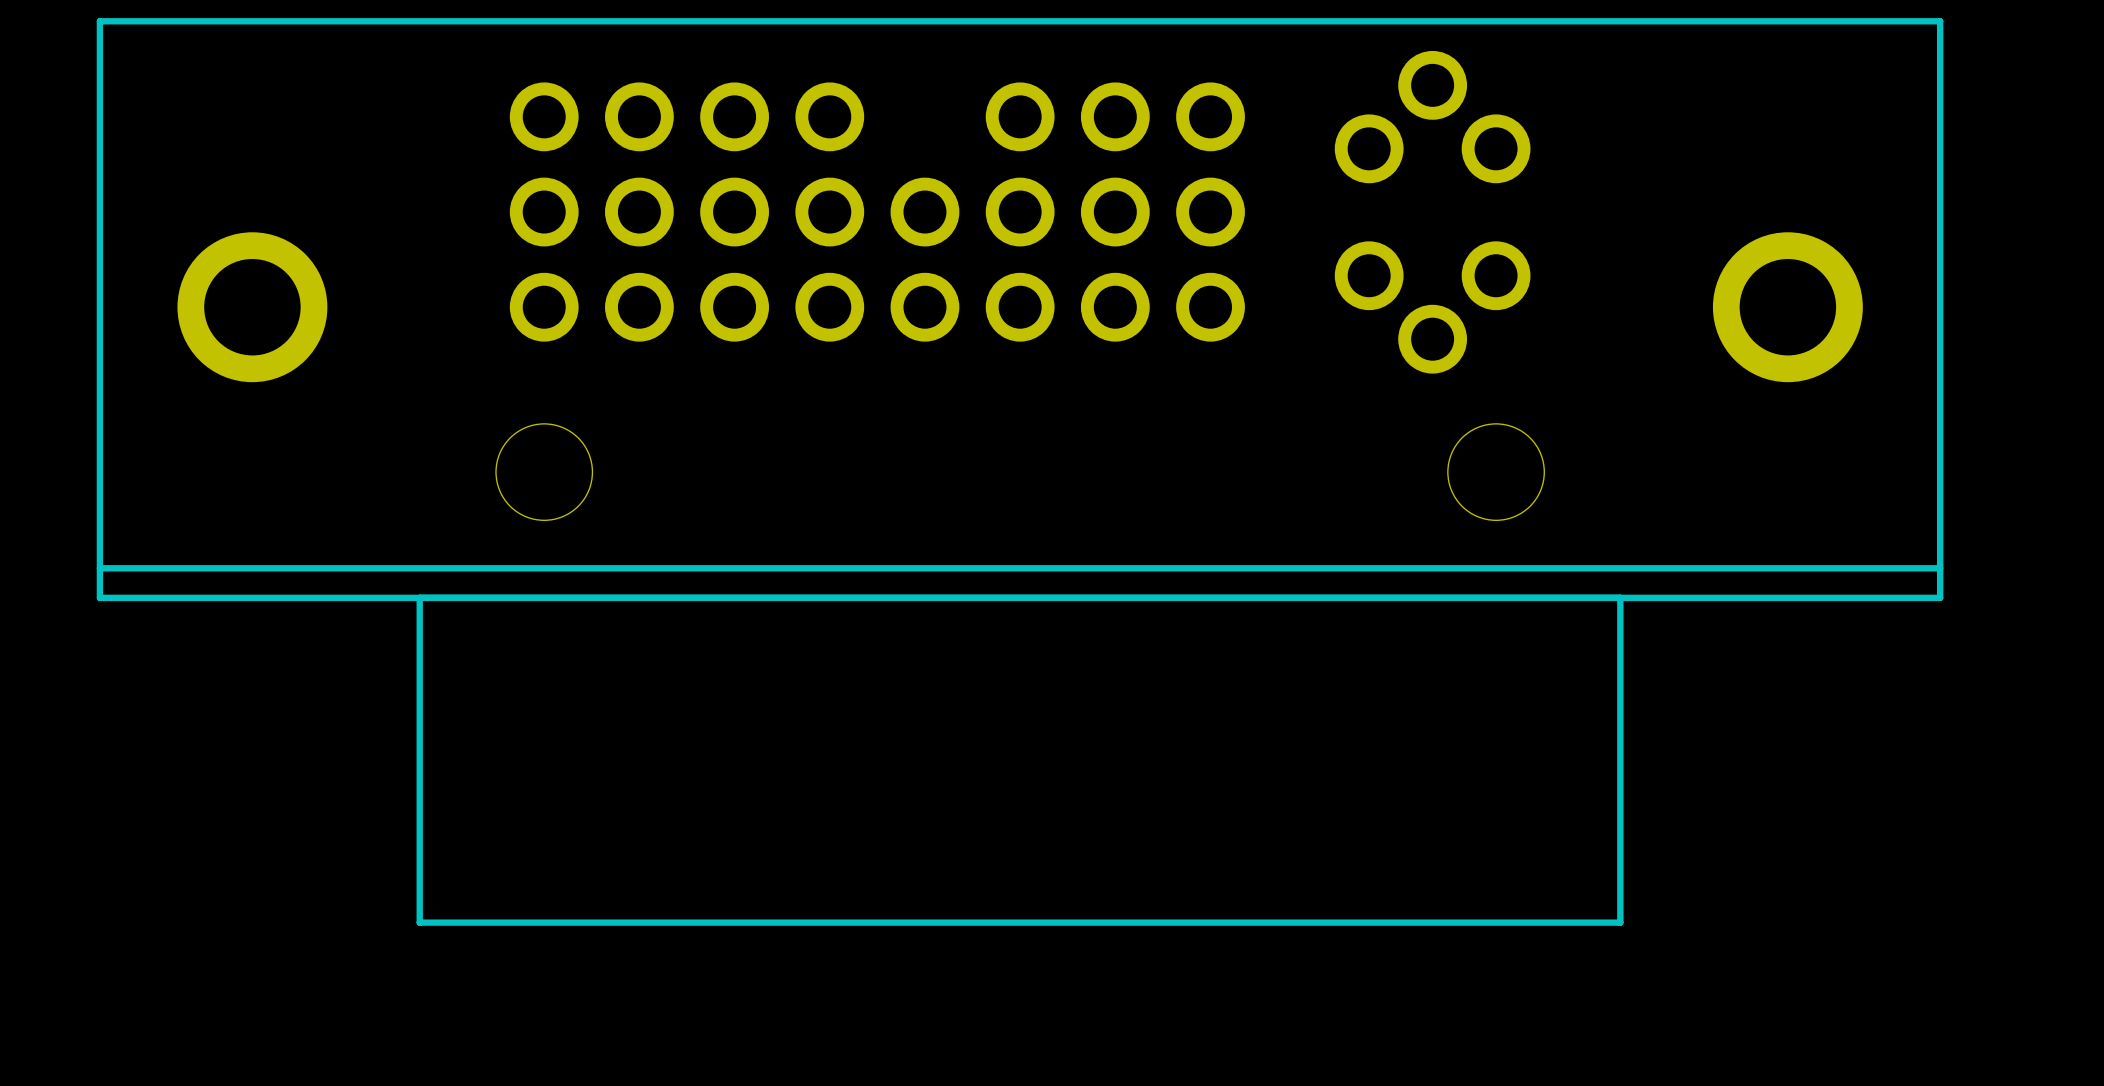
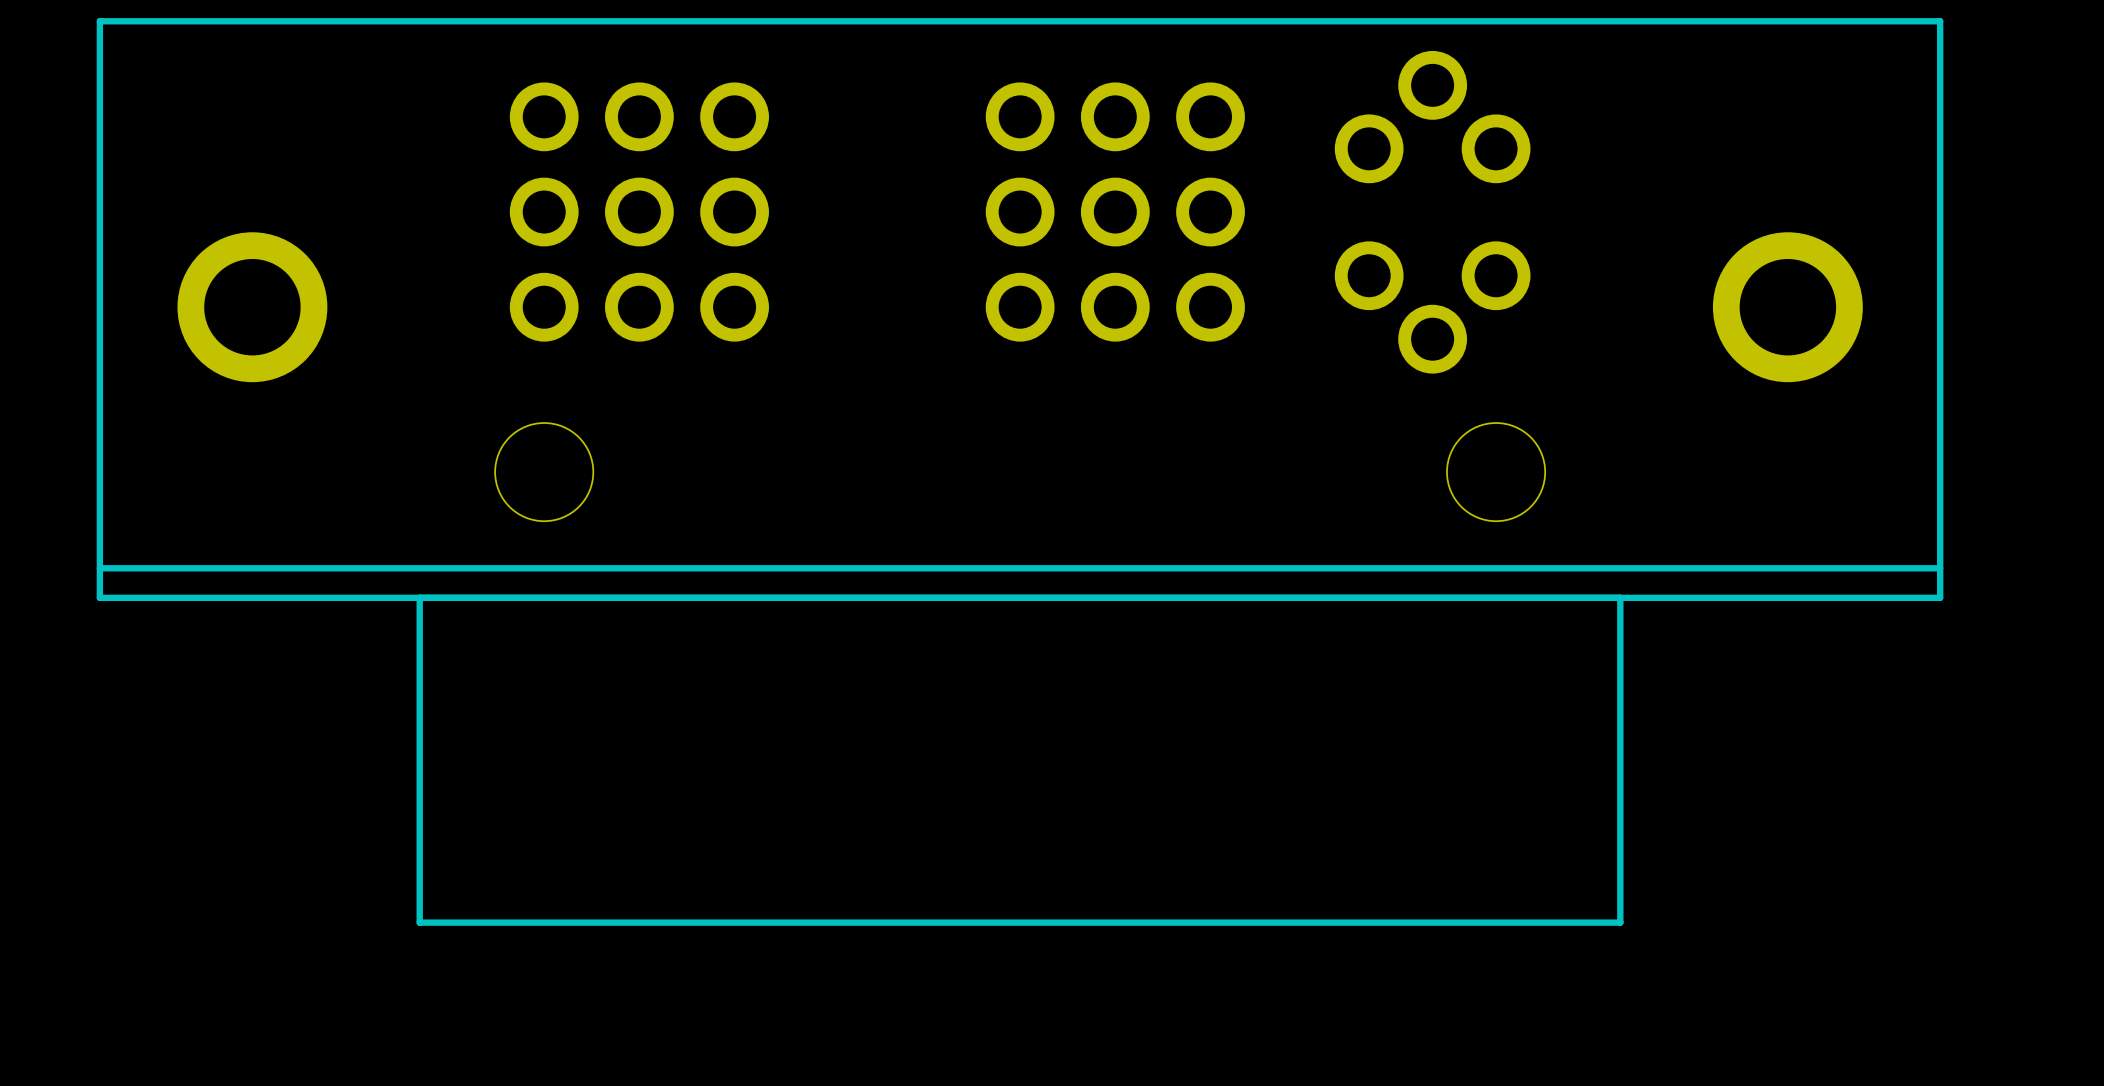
part footprint: [96, 18, 1944, 926] -> [96, 18, 1944, 926]

